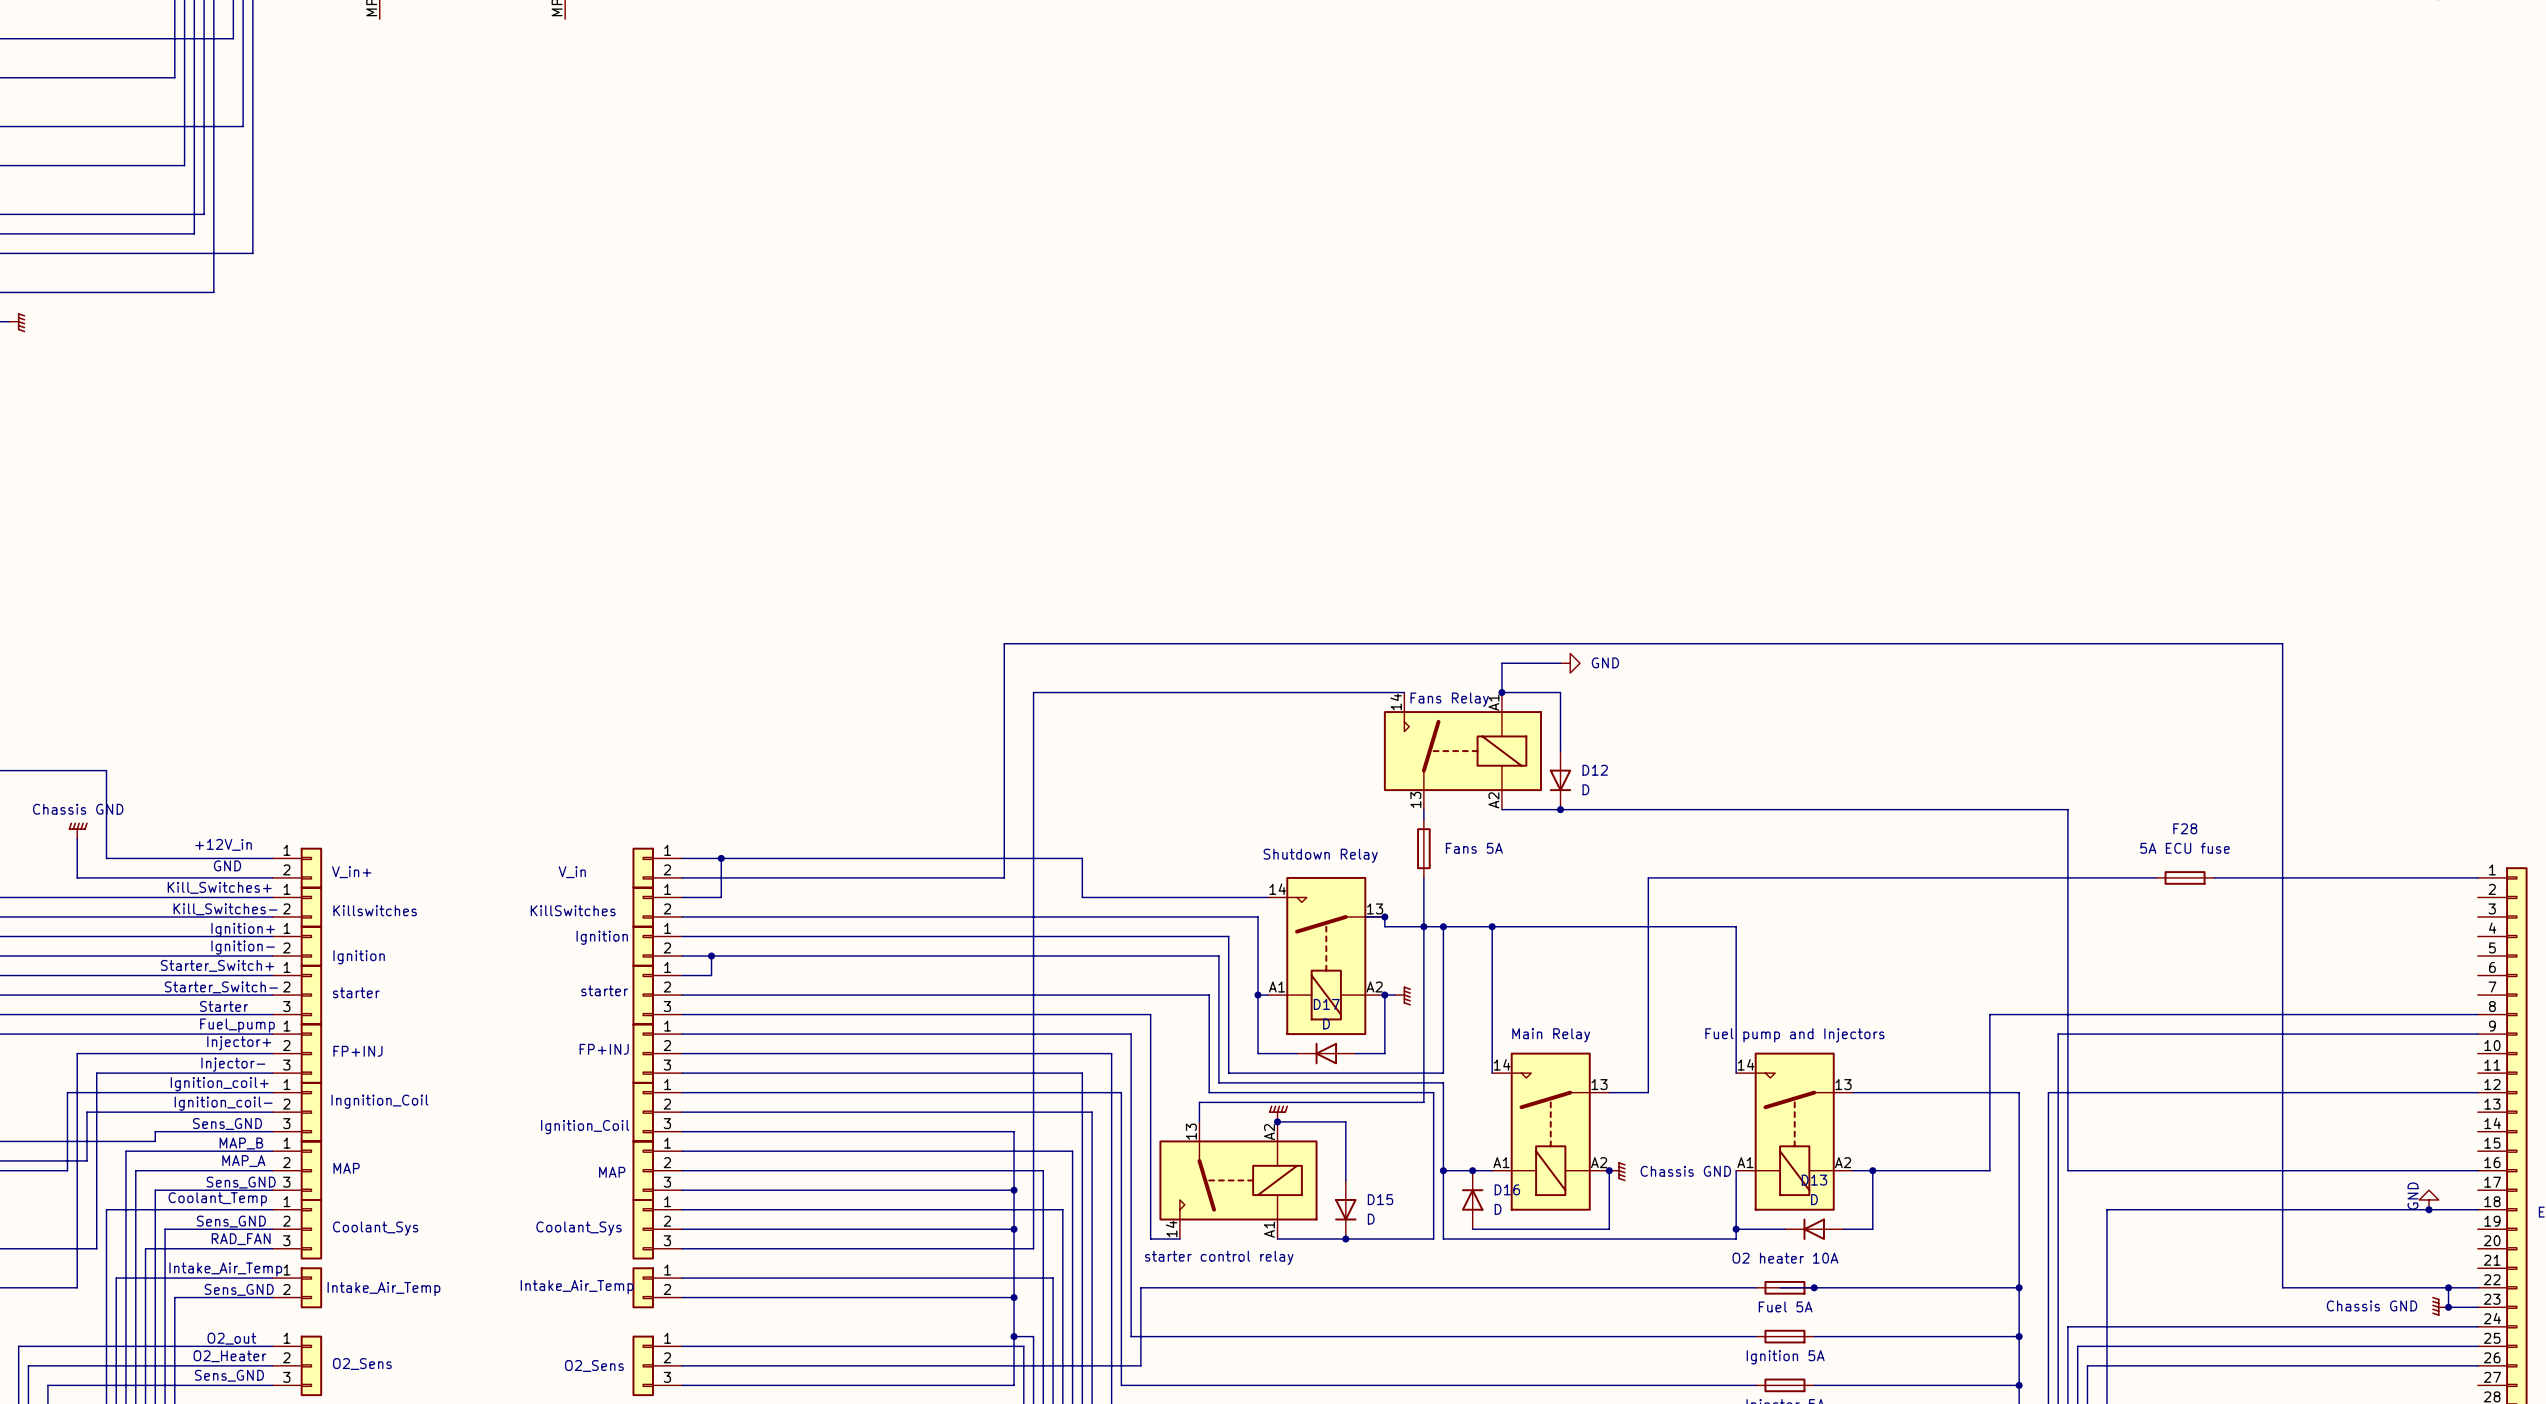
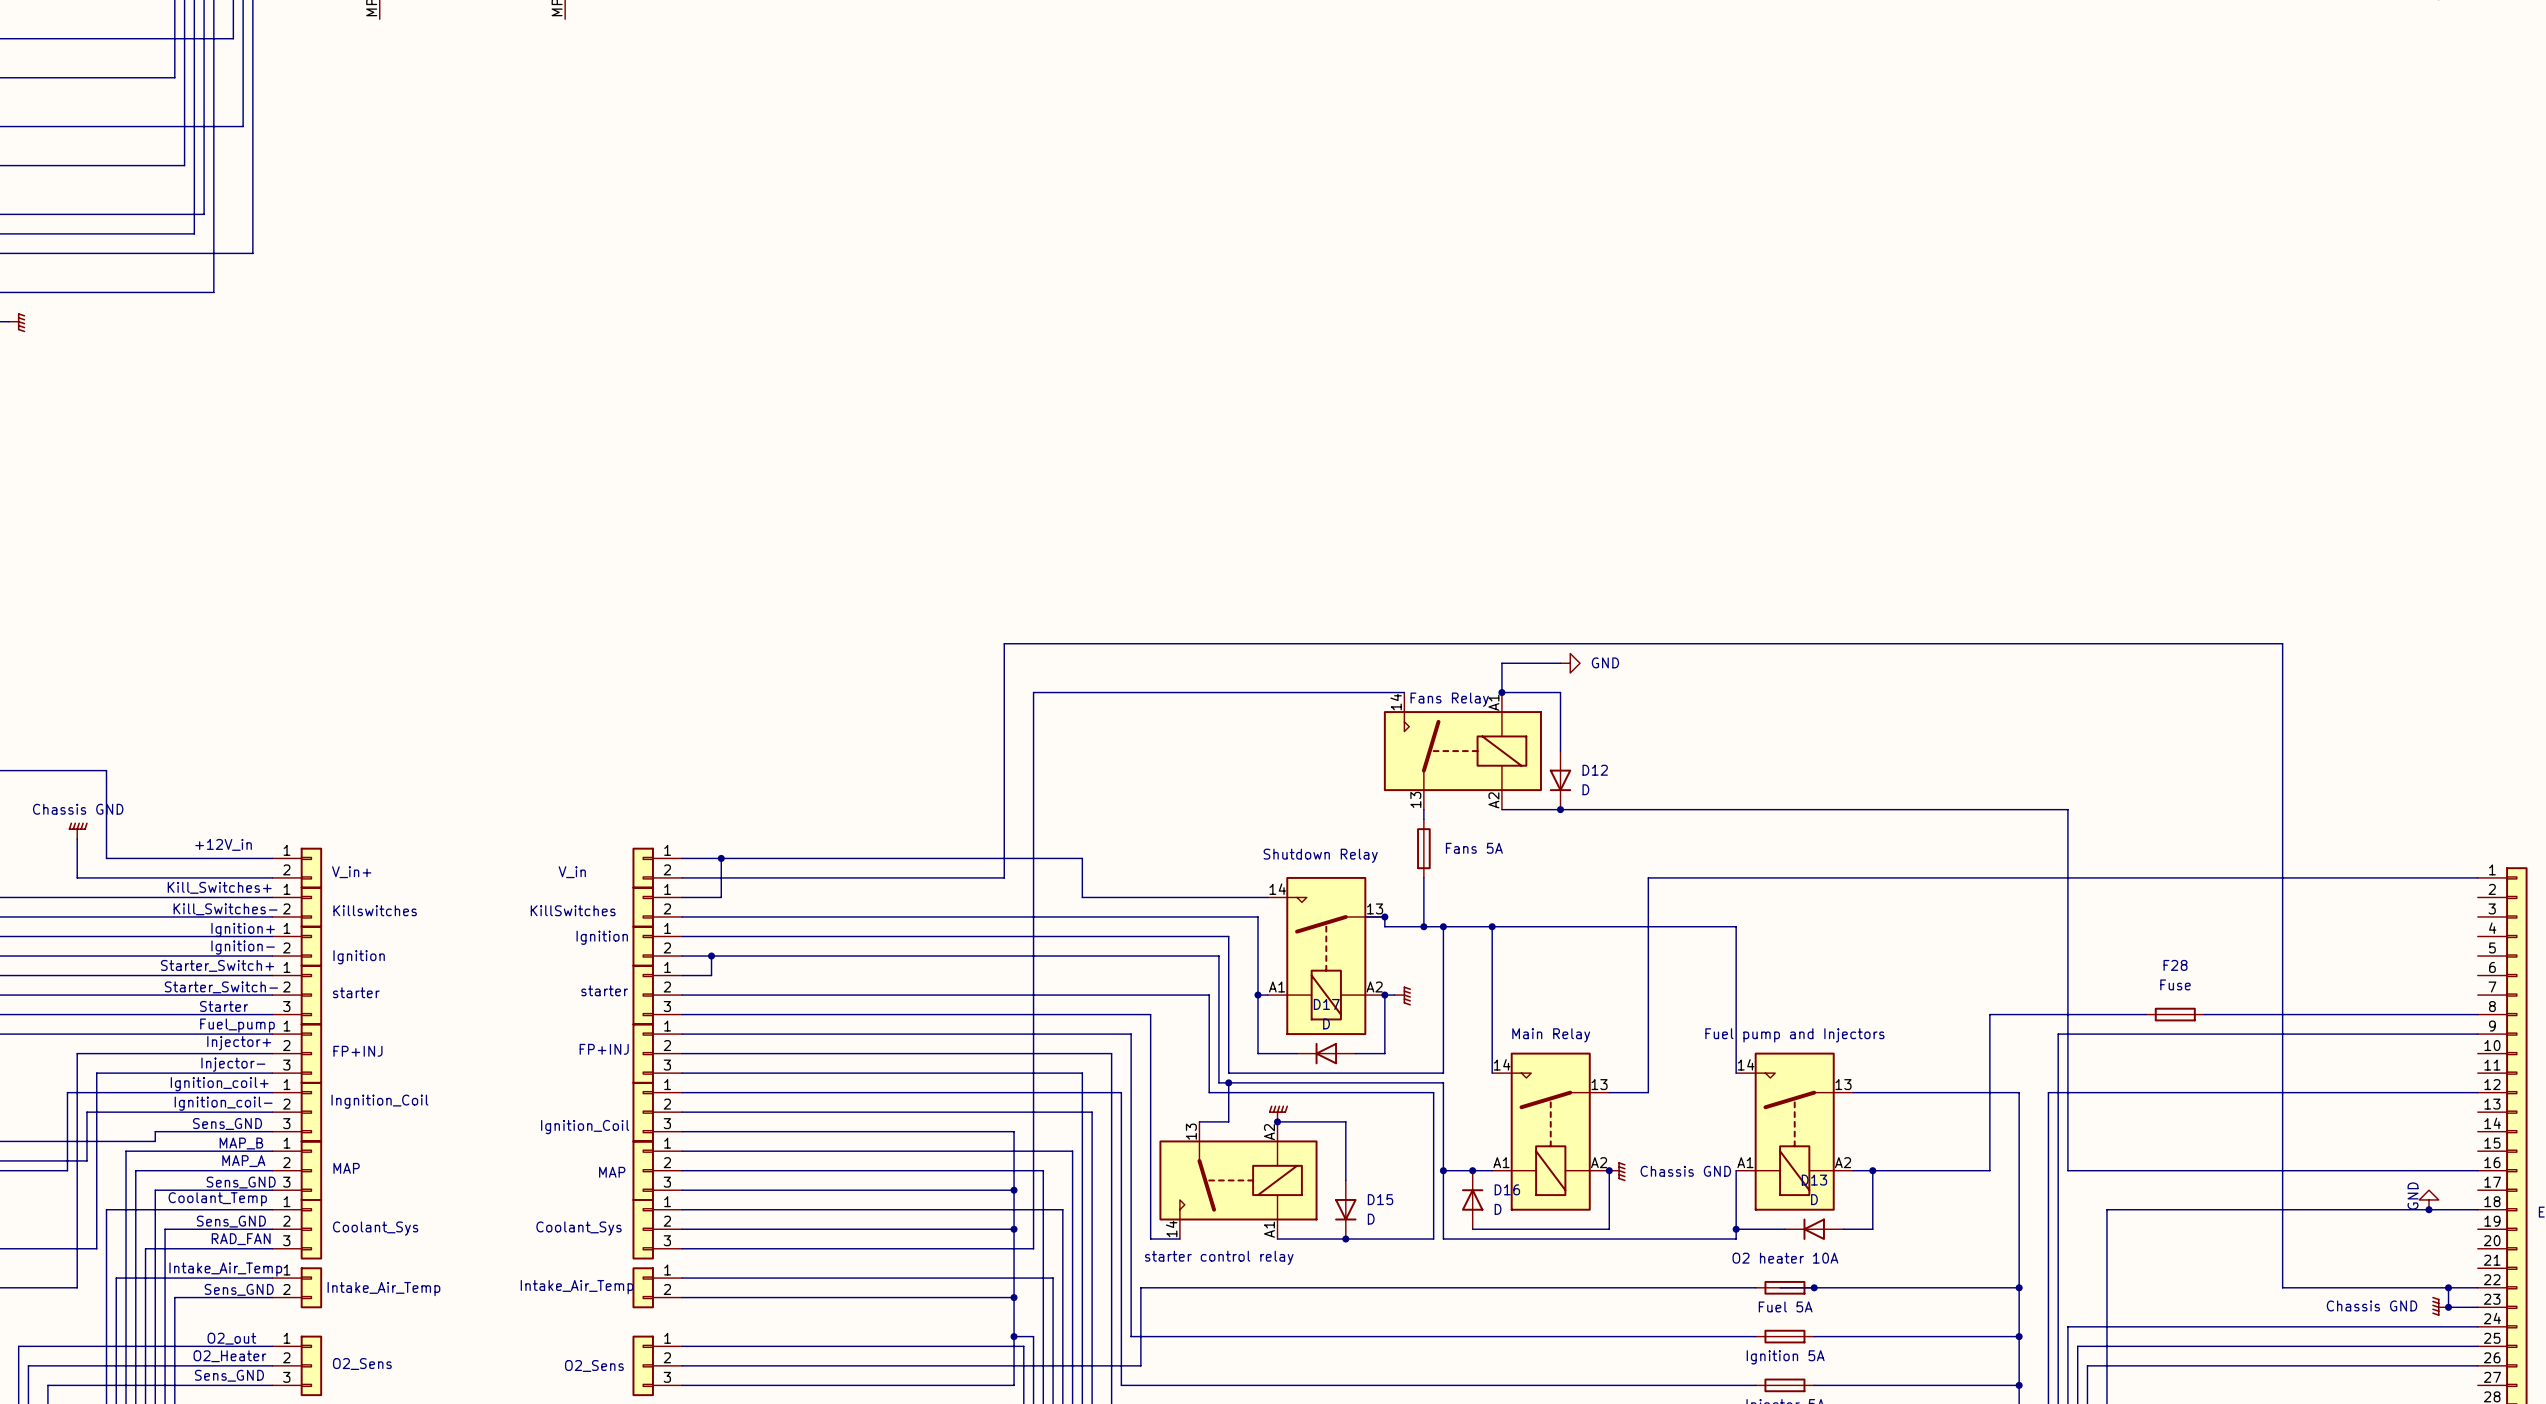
F28 value: 5A ECU fuse (2185, 848) -> Fuse (2175, 984)
text: GND (227, 865) -> none
F28 position: (2185, 877) -> (2175, 1014)
wire: (1423, 926) (1423, 1102) (1199, 1102) (1199, 1121) -> (1228, 1082) (1228, 1121) (1199, 1121)
junction: none -> (1228, 1082)

